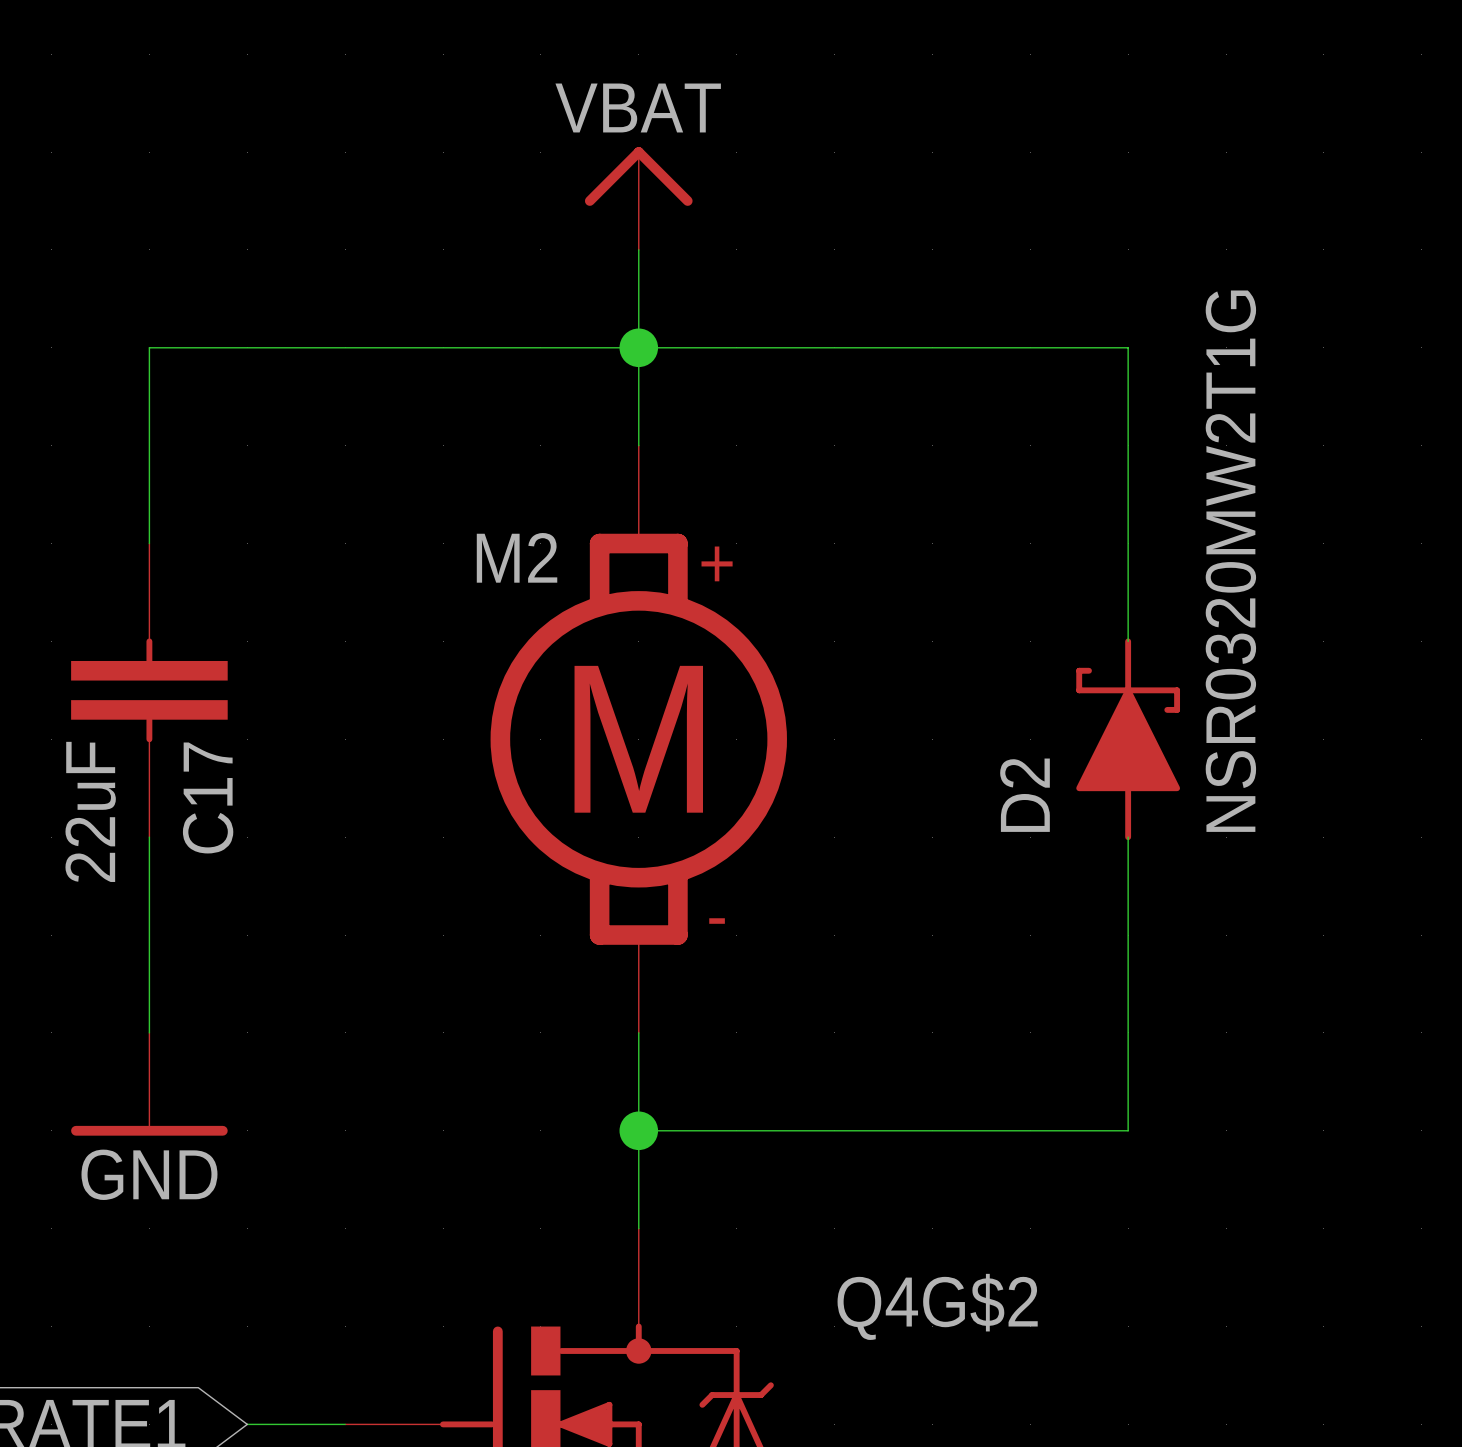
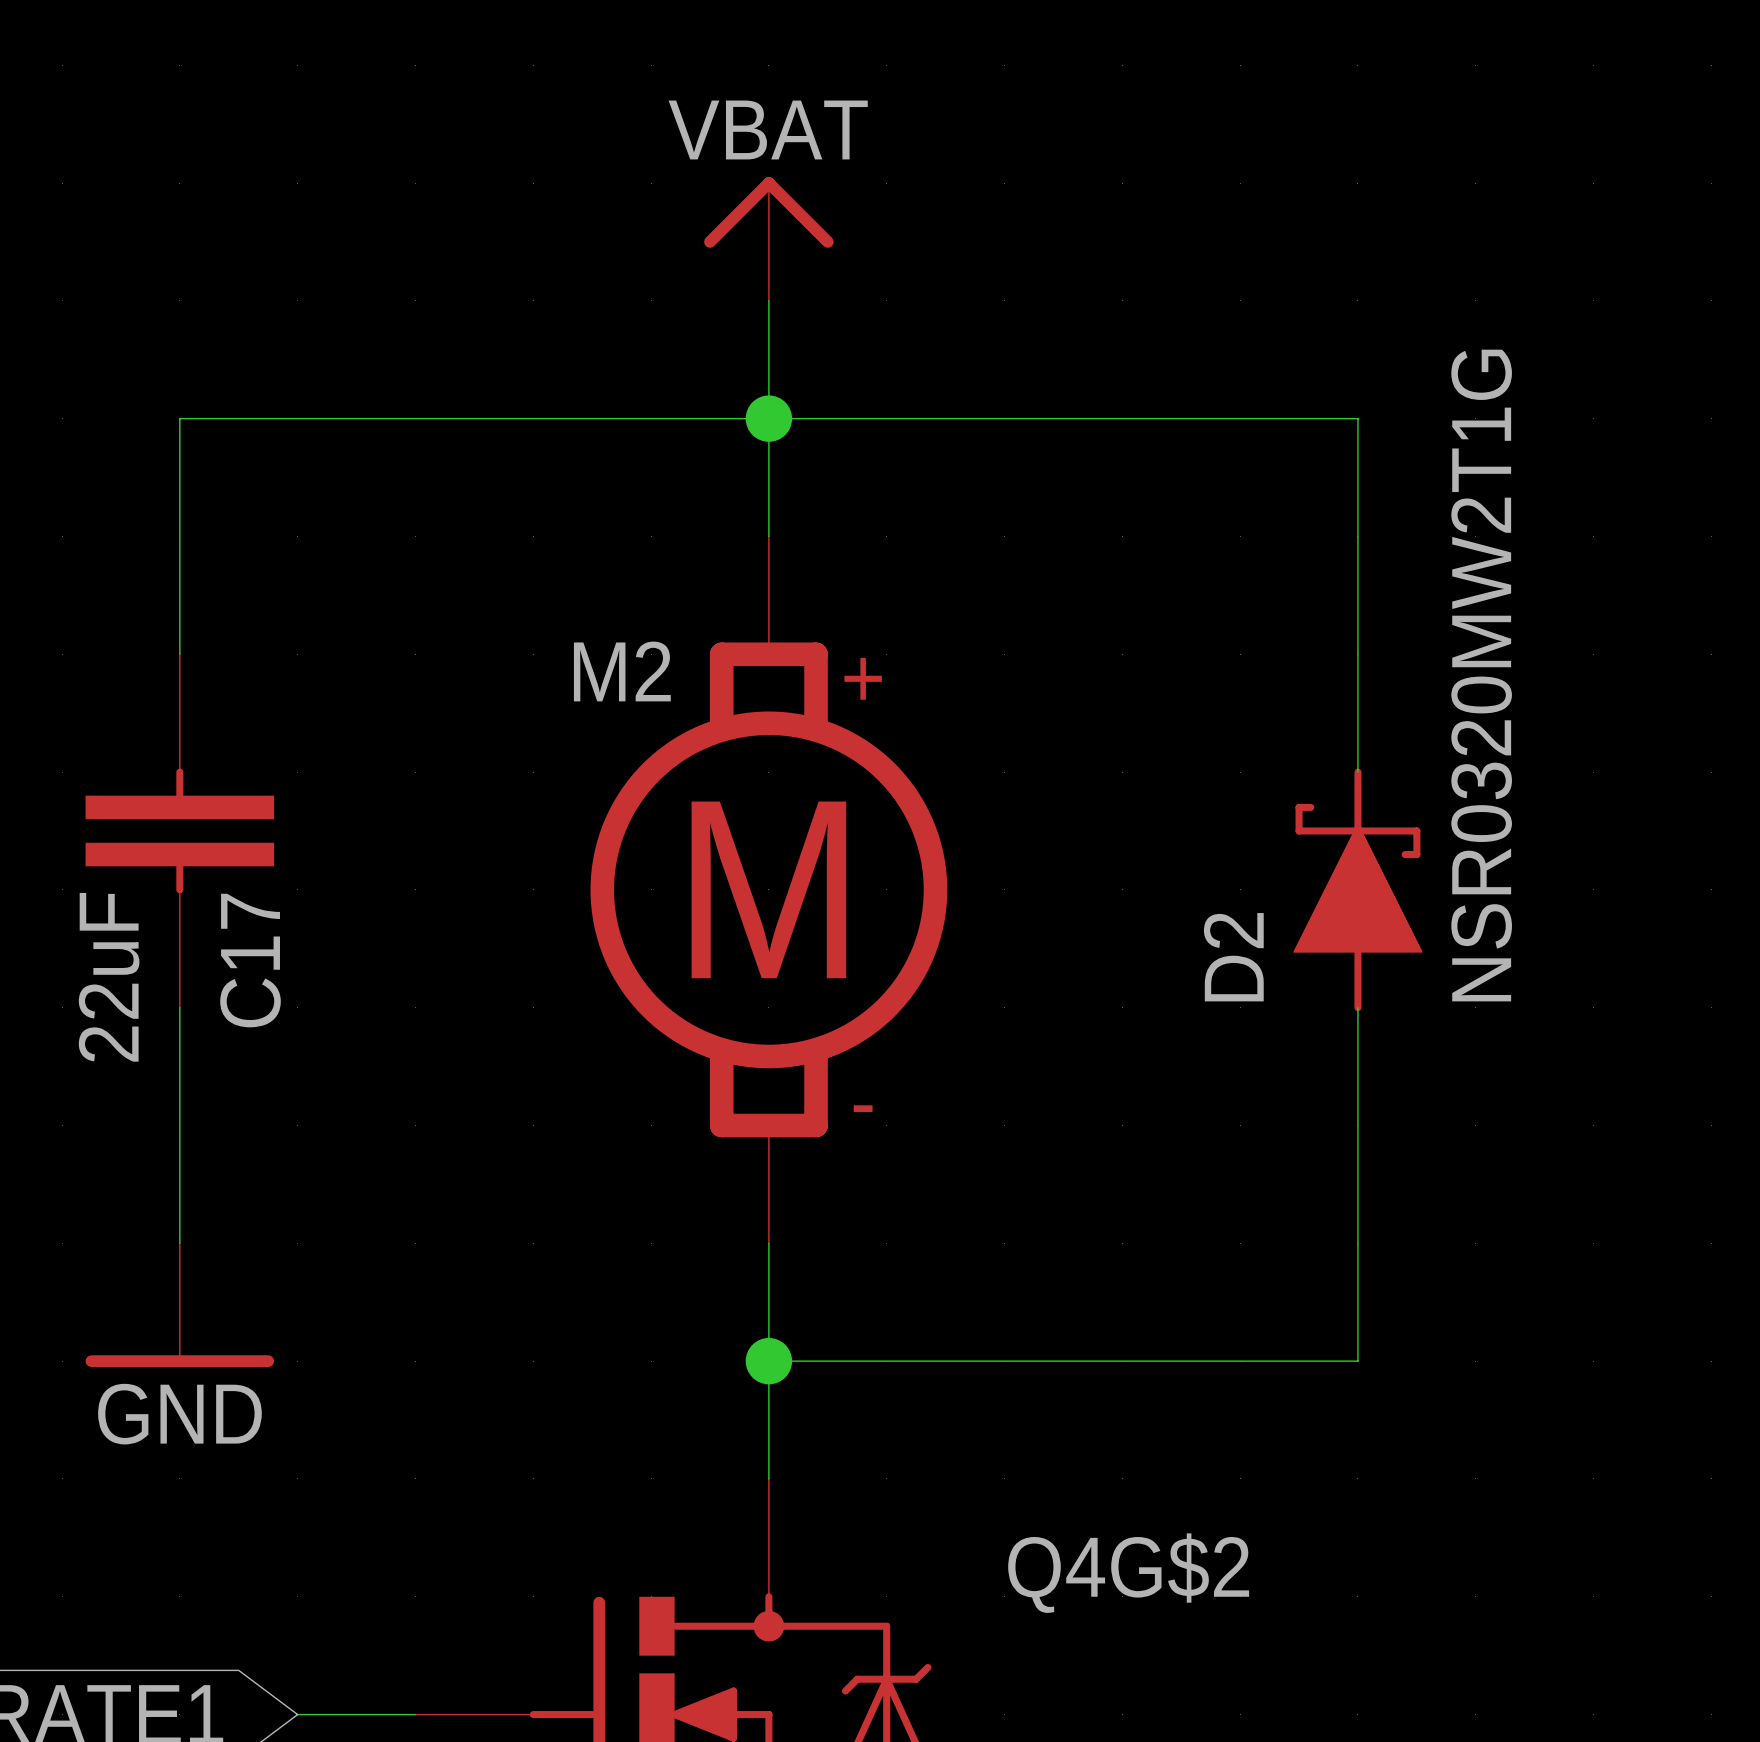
D2 symbol: [1076, 638, 1181, 841] -> [1293, 768, 1423, 1012]

